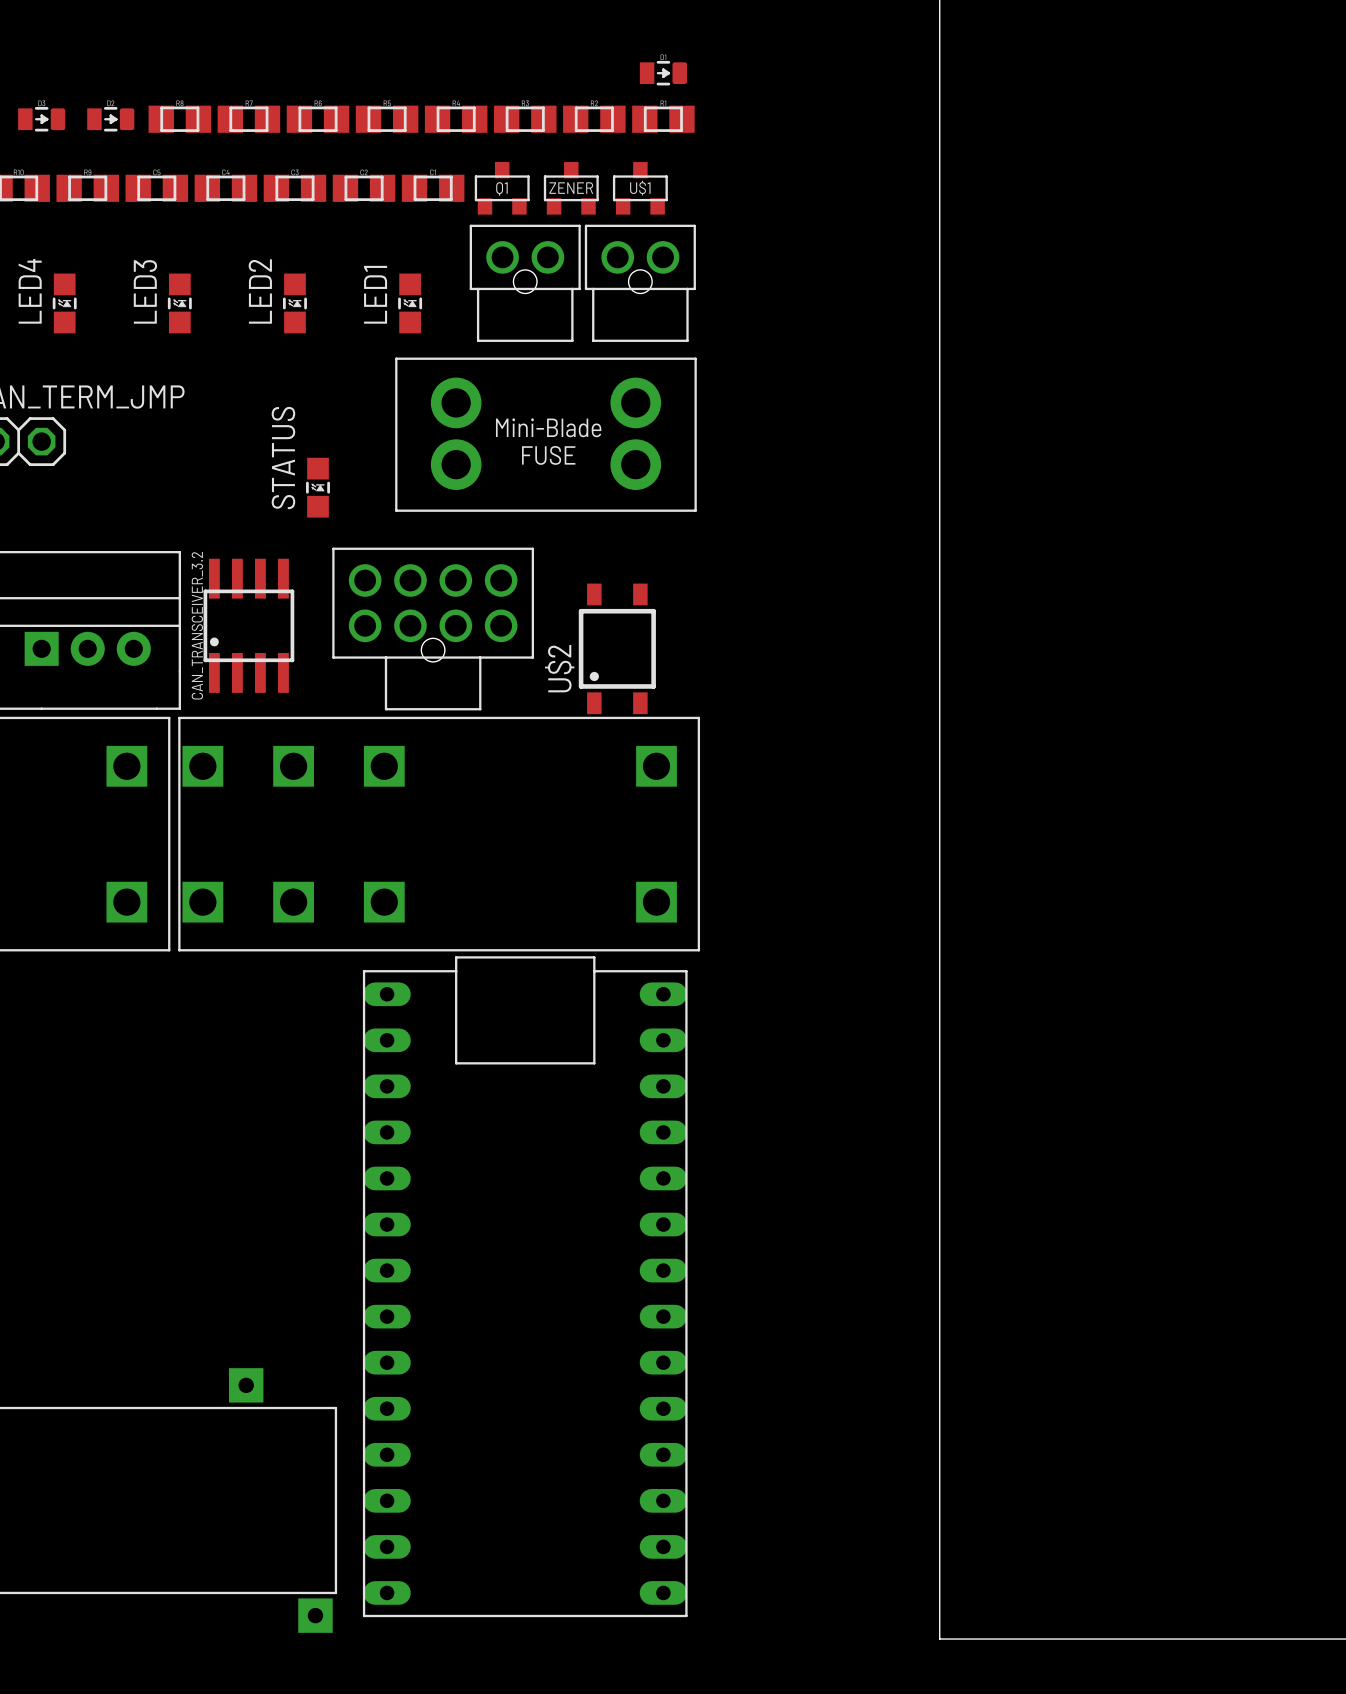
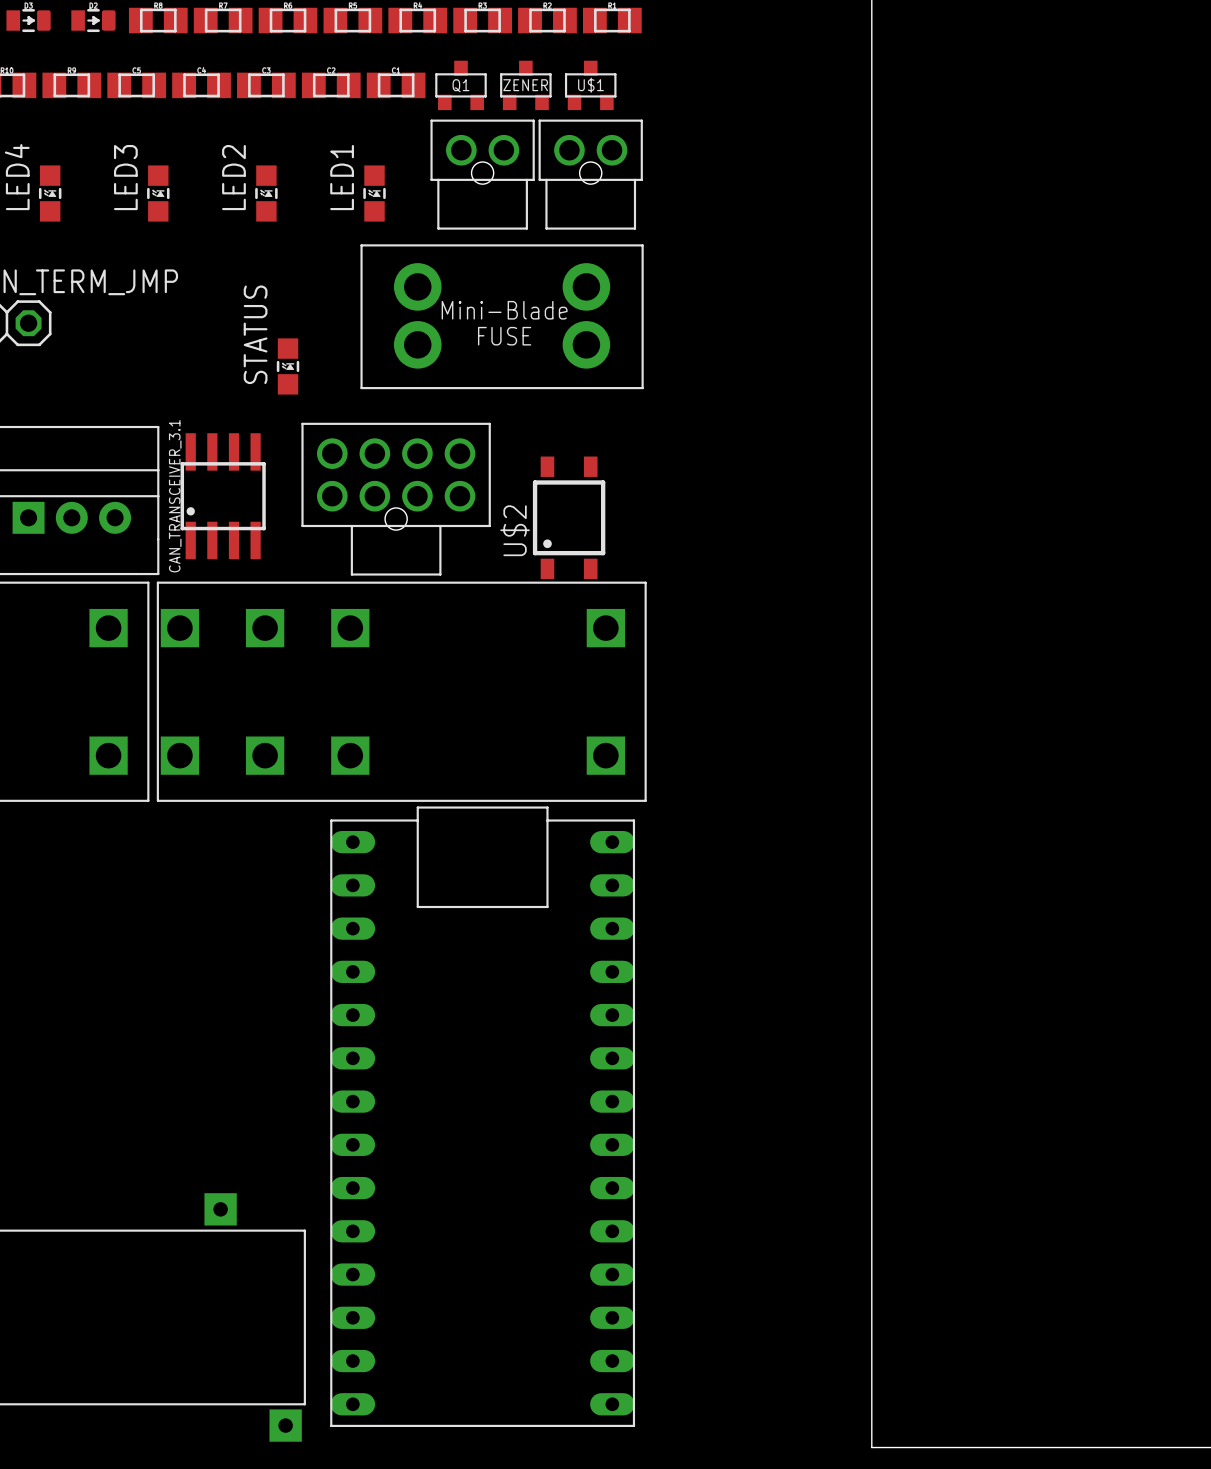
CAN_TRANSCEIVER_3.2 name: CAN_TRANSCEIVER_3.2 (197, 625) -> CAN_TRANSCEIVER_3.1 (175, 496)

